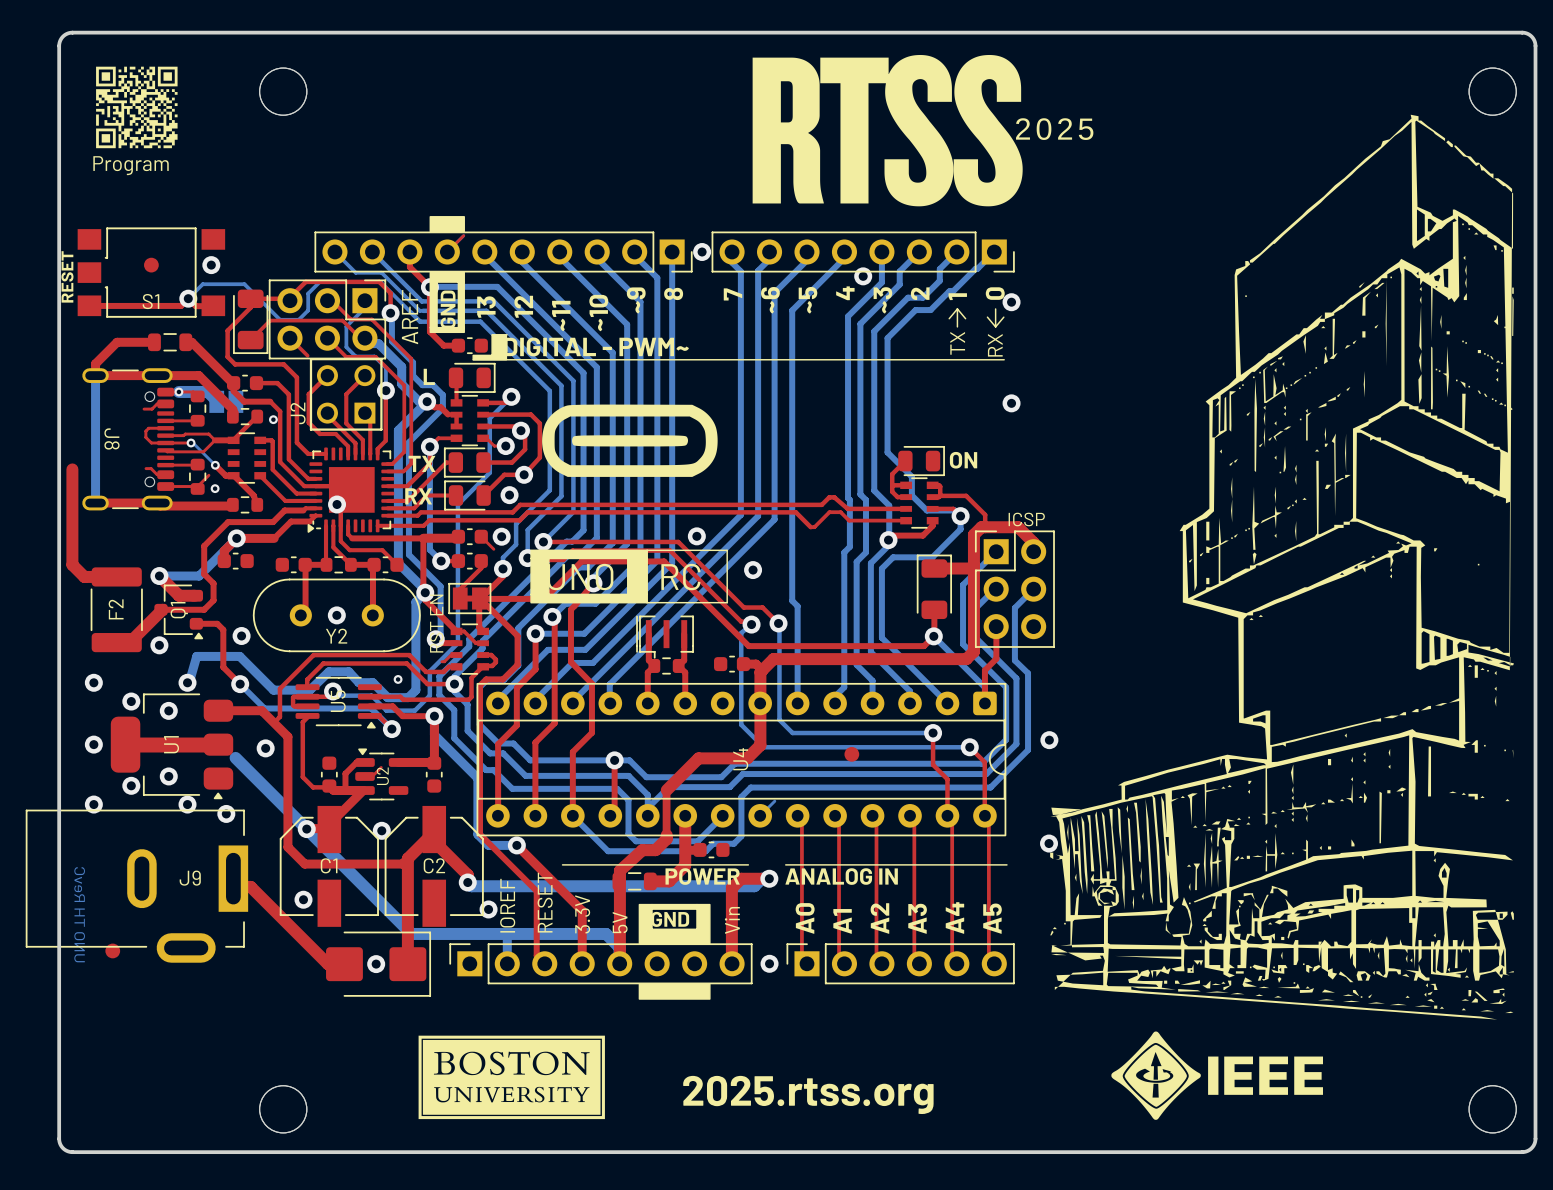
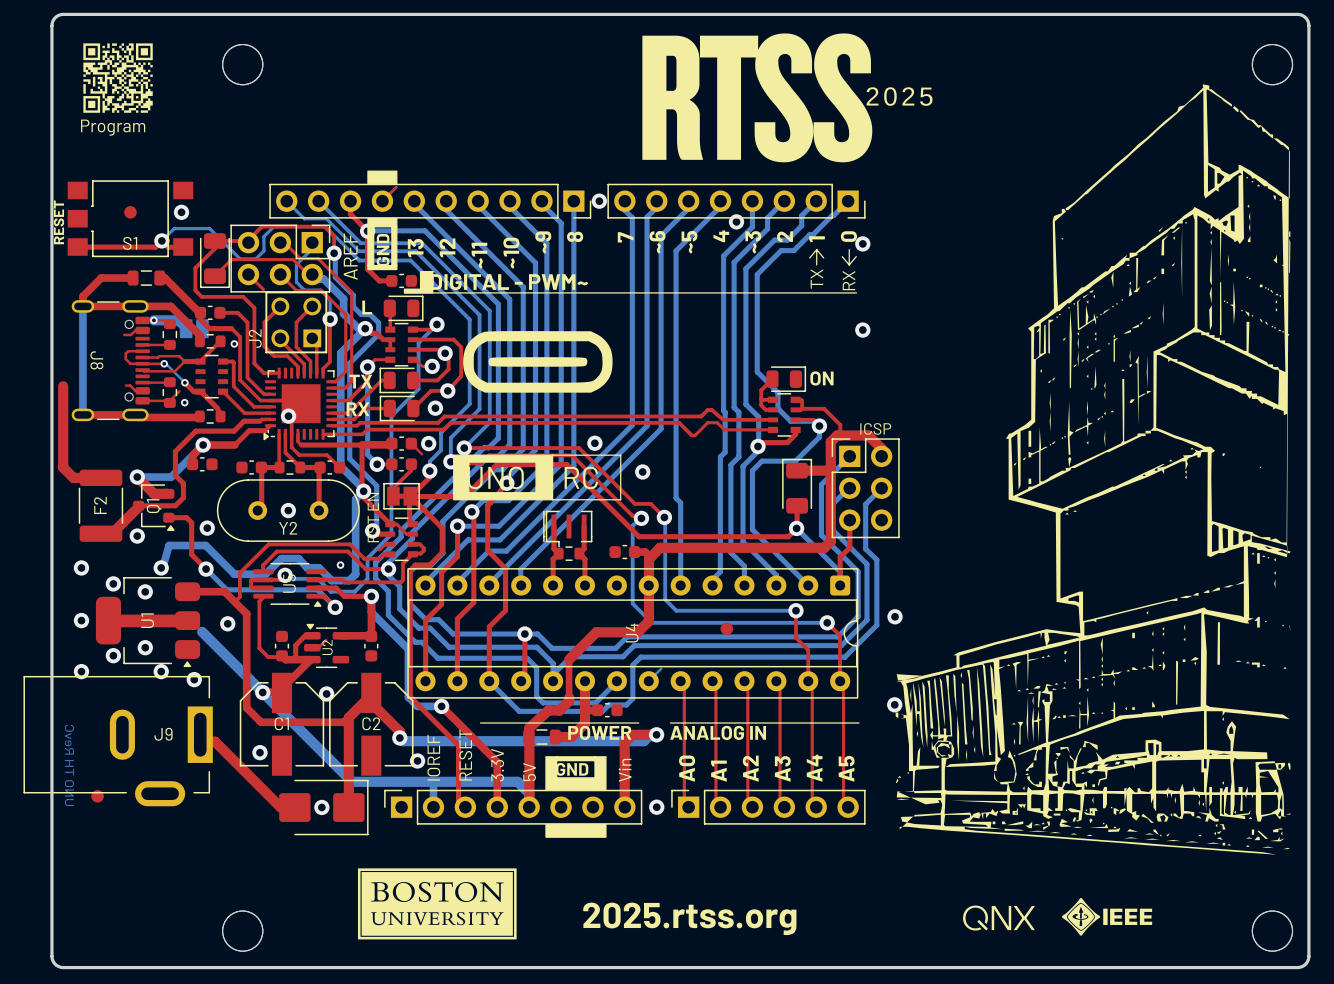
drawing: [1111, 1031, 1323, 1120] -> none
drawing: none -> [1062, 898, 1153, 936]
drawing: none -> [963, 905, 1035, 931]

